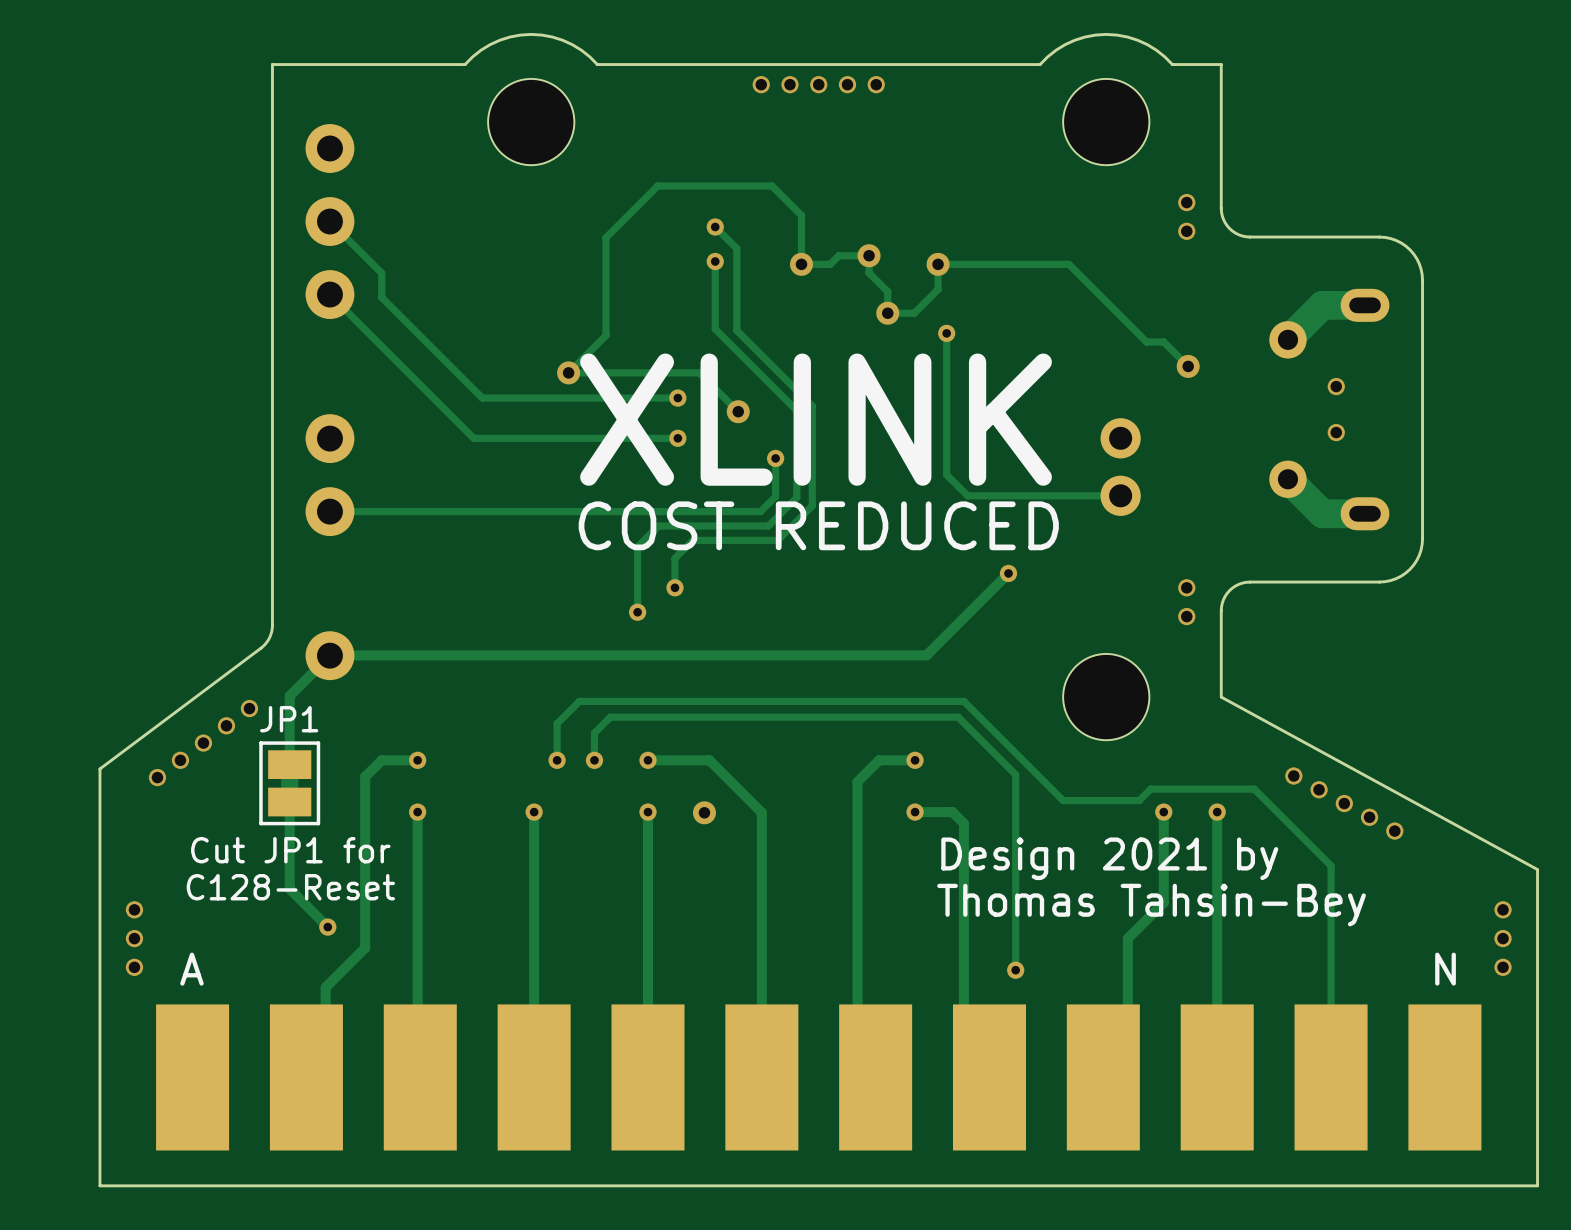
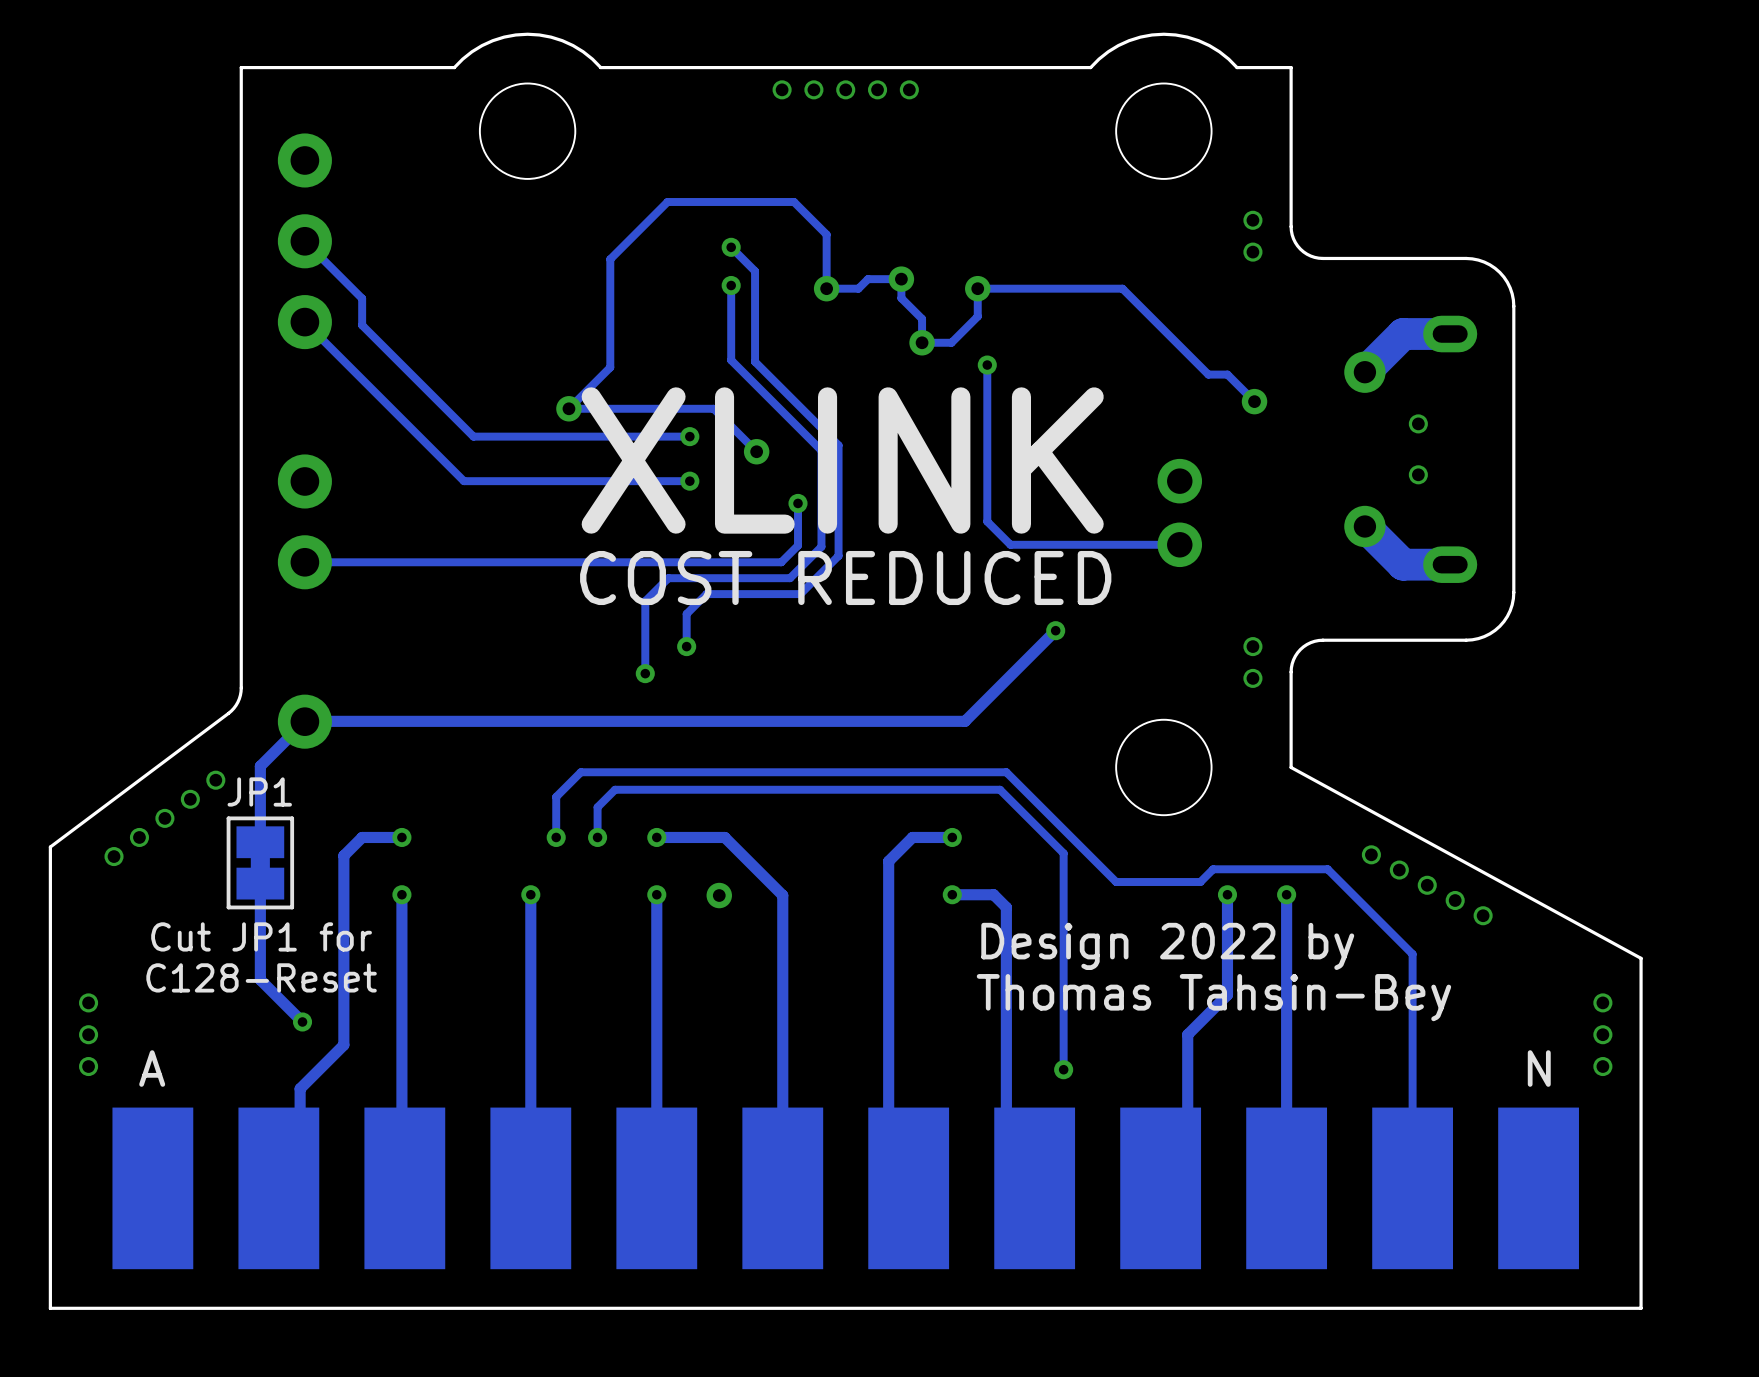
text: Design 2021 by (1109, 858) -> Design 2022 by (1167, 946)

